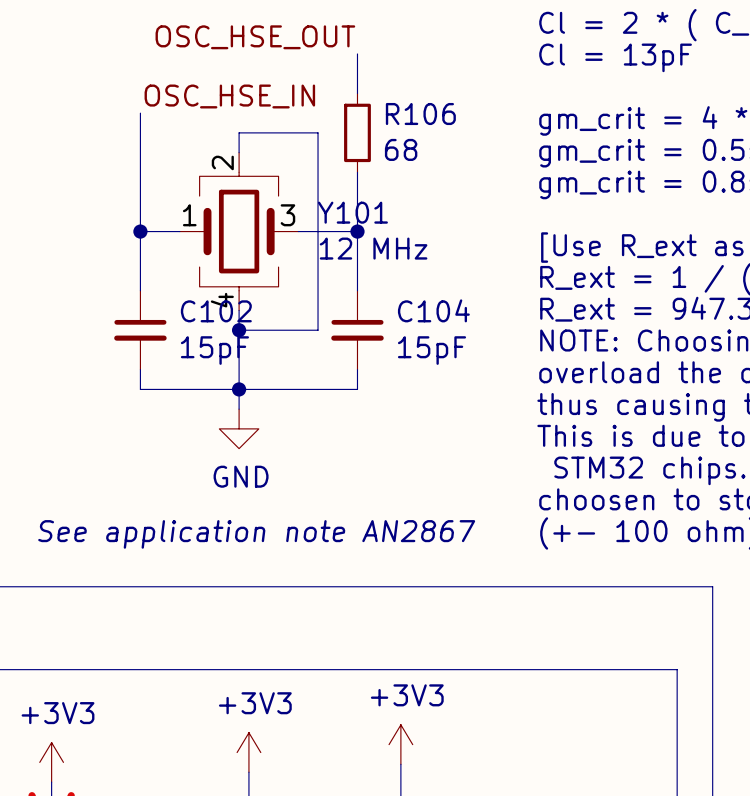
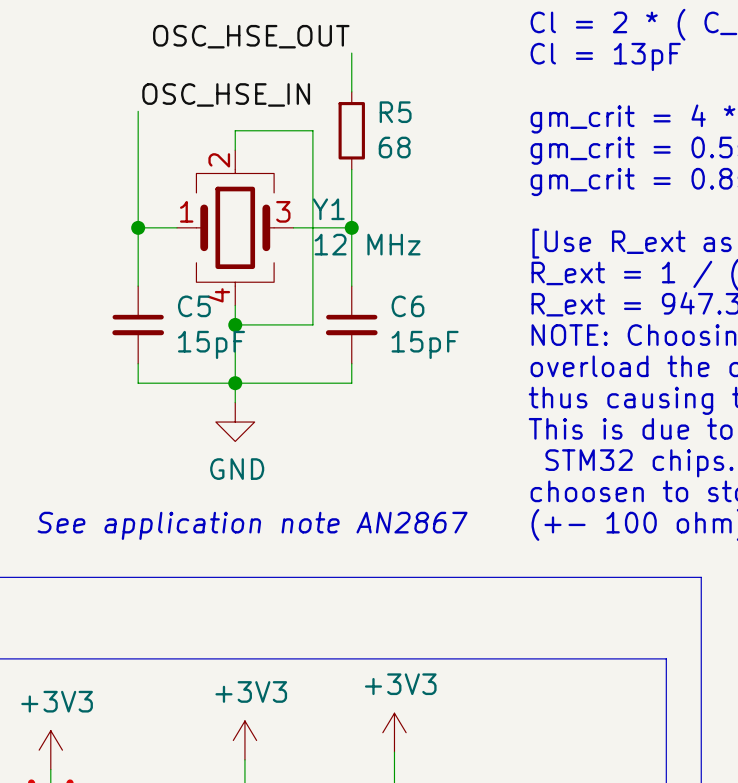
R106 name: R106 (420, 114) -> R5 (395, 112)
Y101 name: Y101 (352, 212) -> Y1 (328, 209)
C104 name: C104 (433, 310) -> C6 (407, 306)
C102 name: C102 (216, 311) -> C5 (194, 306)

